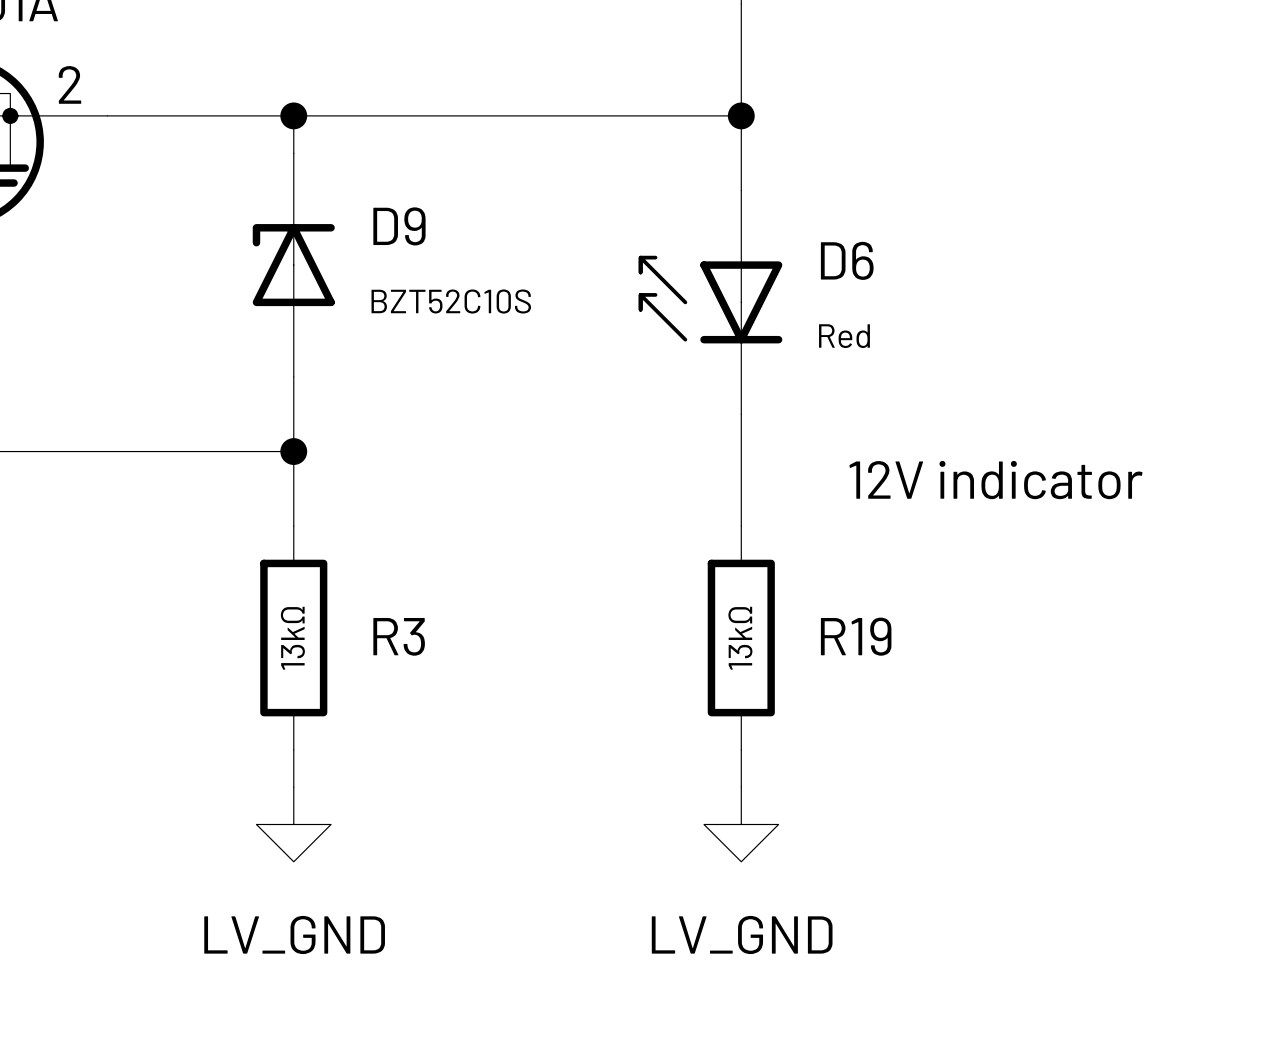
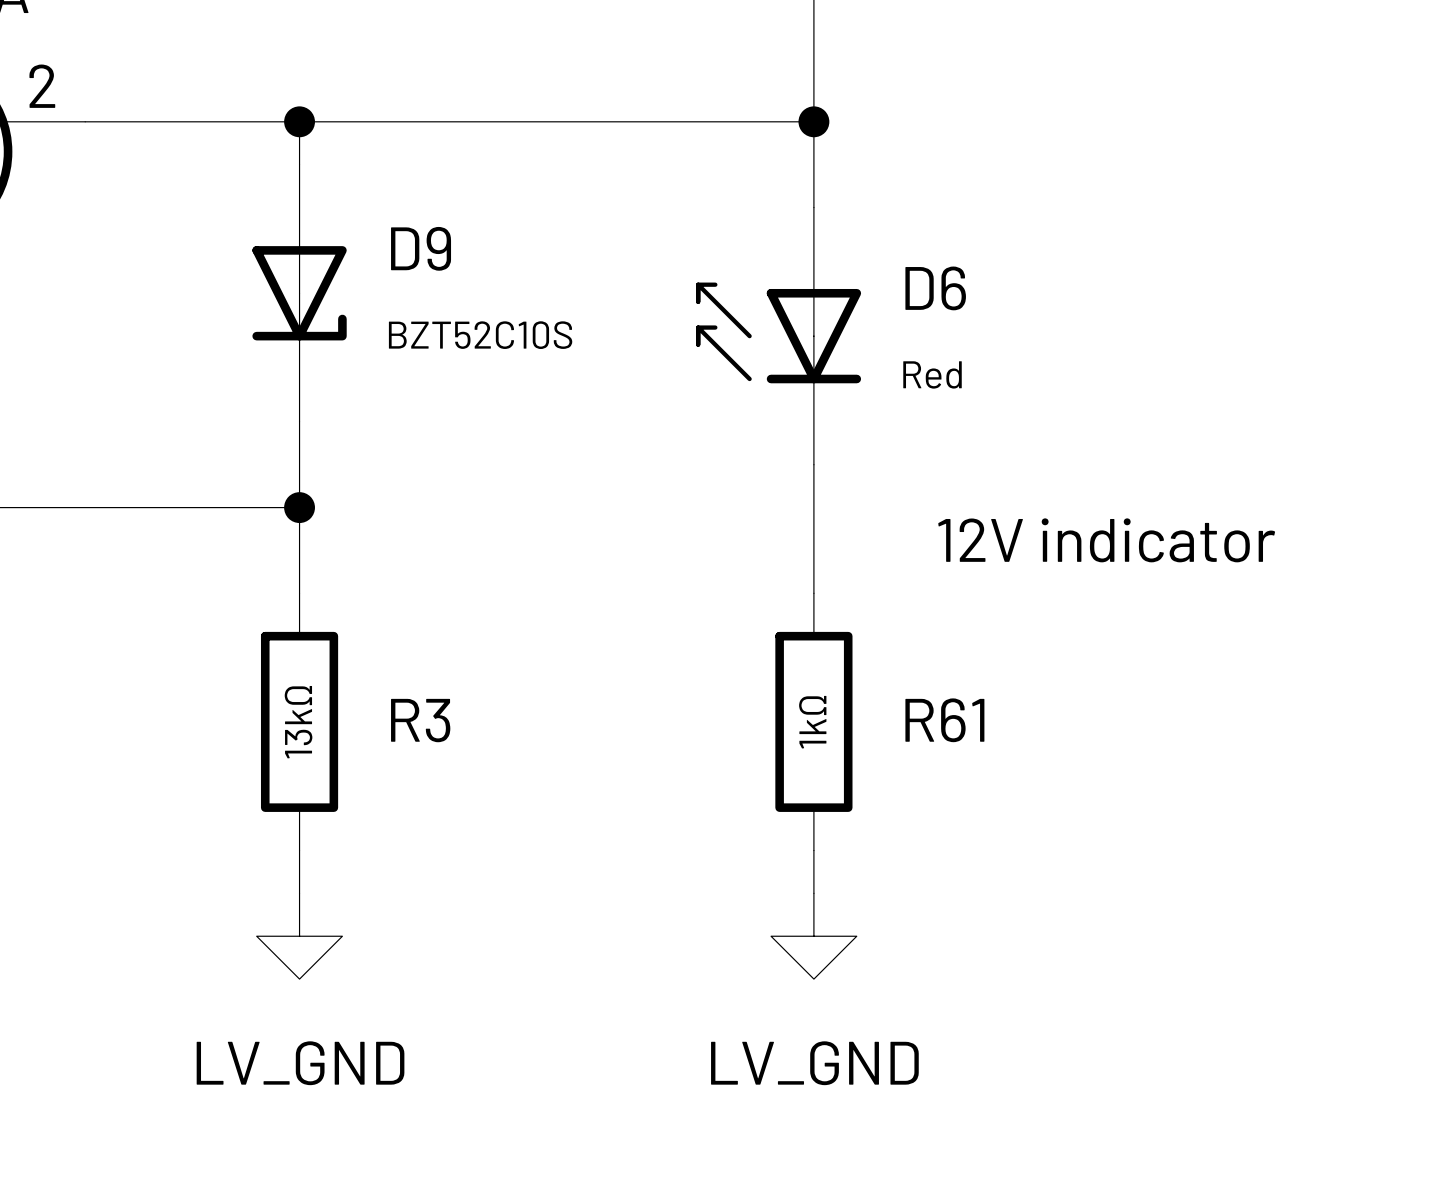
D9 rotation: 0° (293, 265) -> 180° (299, 293)
R19 name: R19 (856, 636) -> R61 (944, 720)
R19 value: 13kΩ (740, 638) -> 1kΩ (812, 722)

